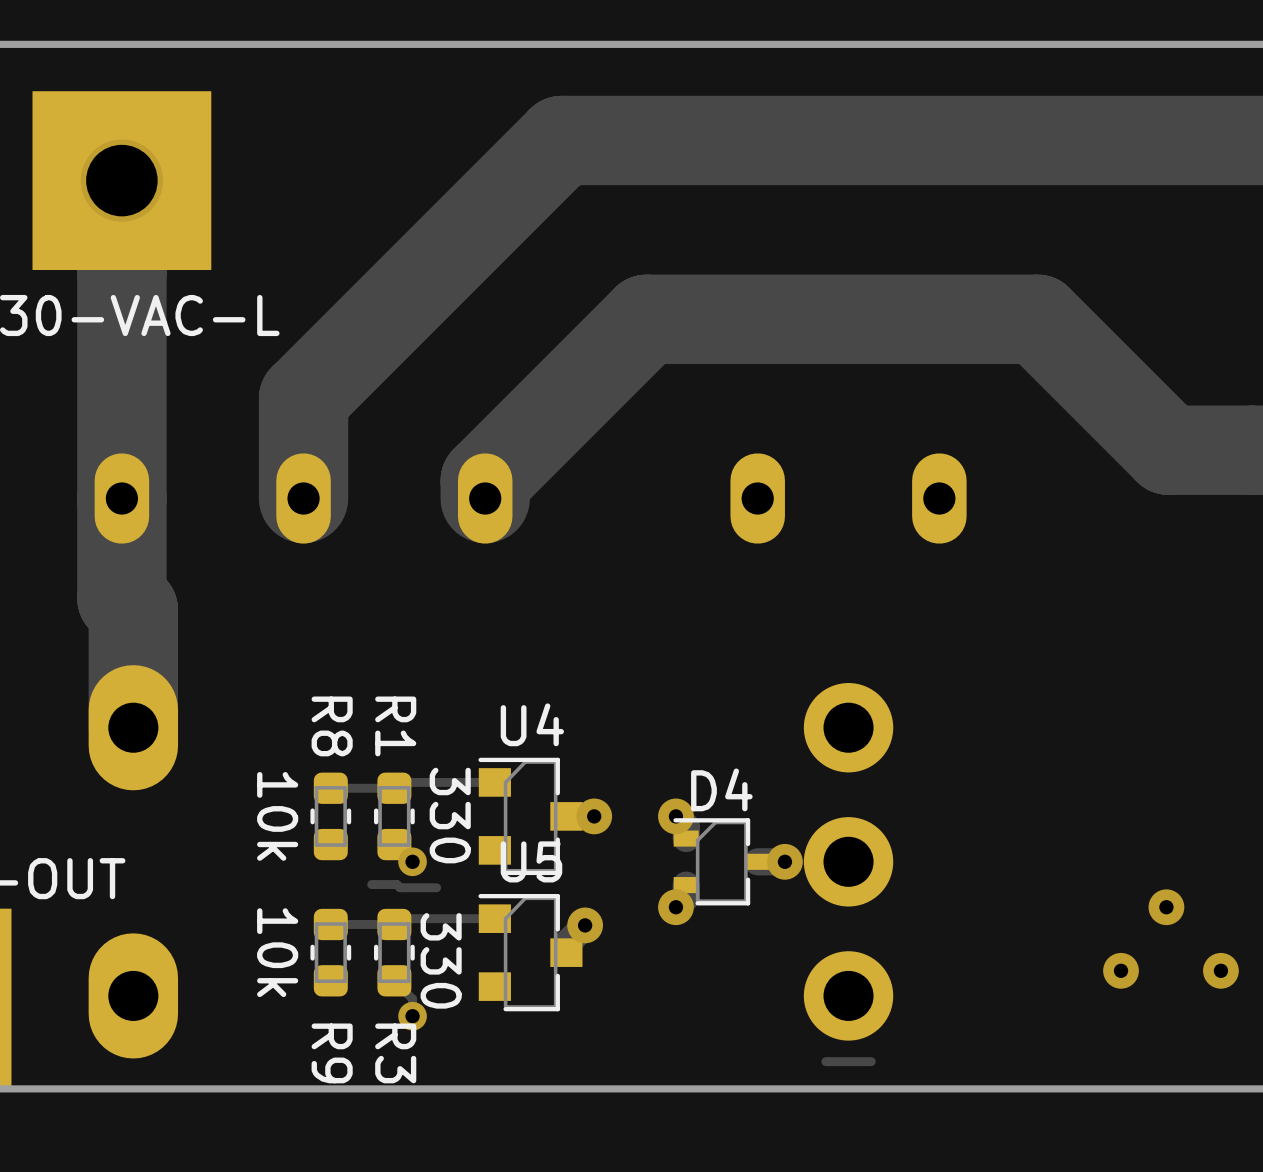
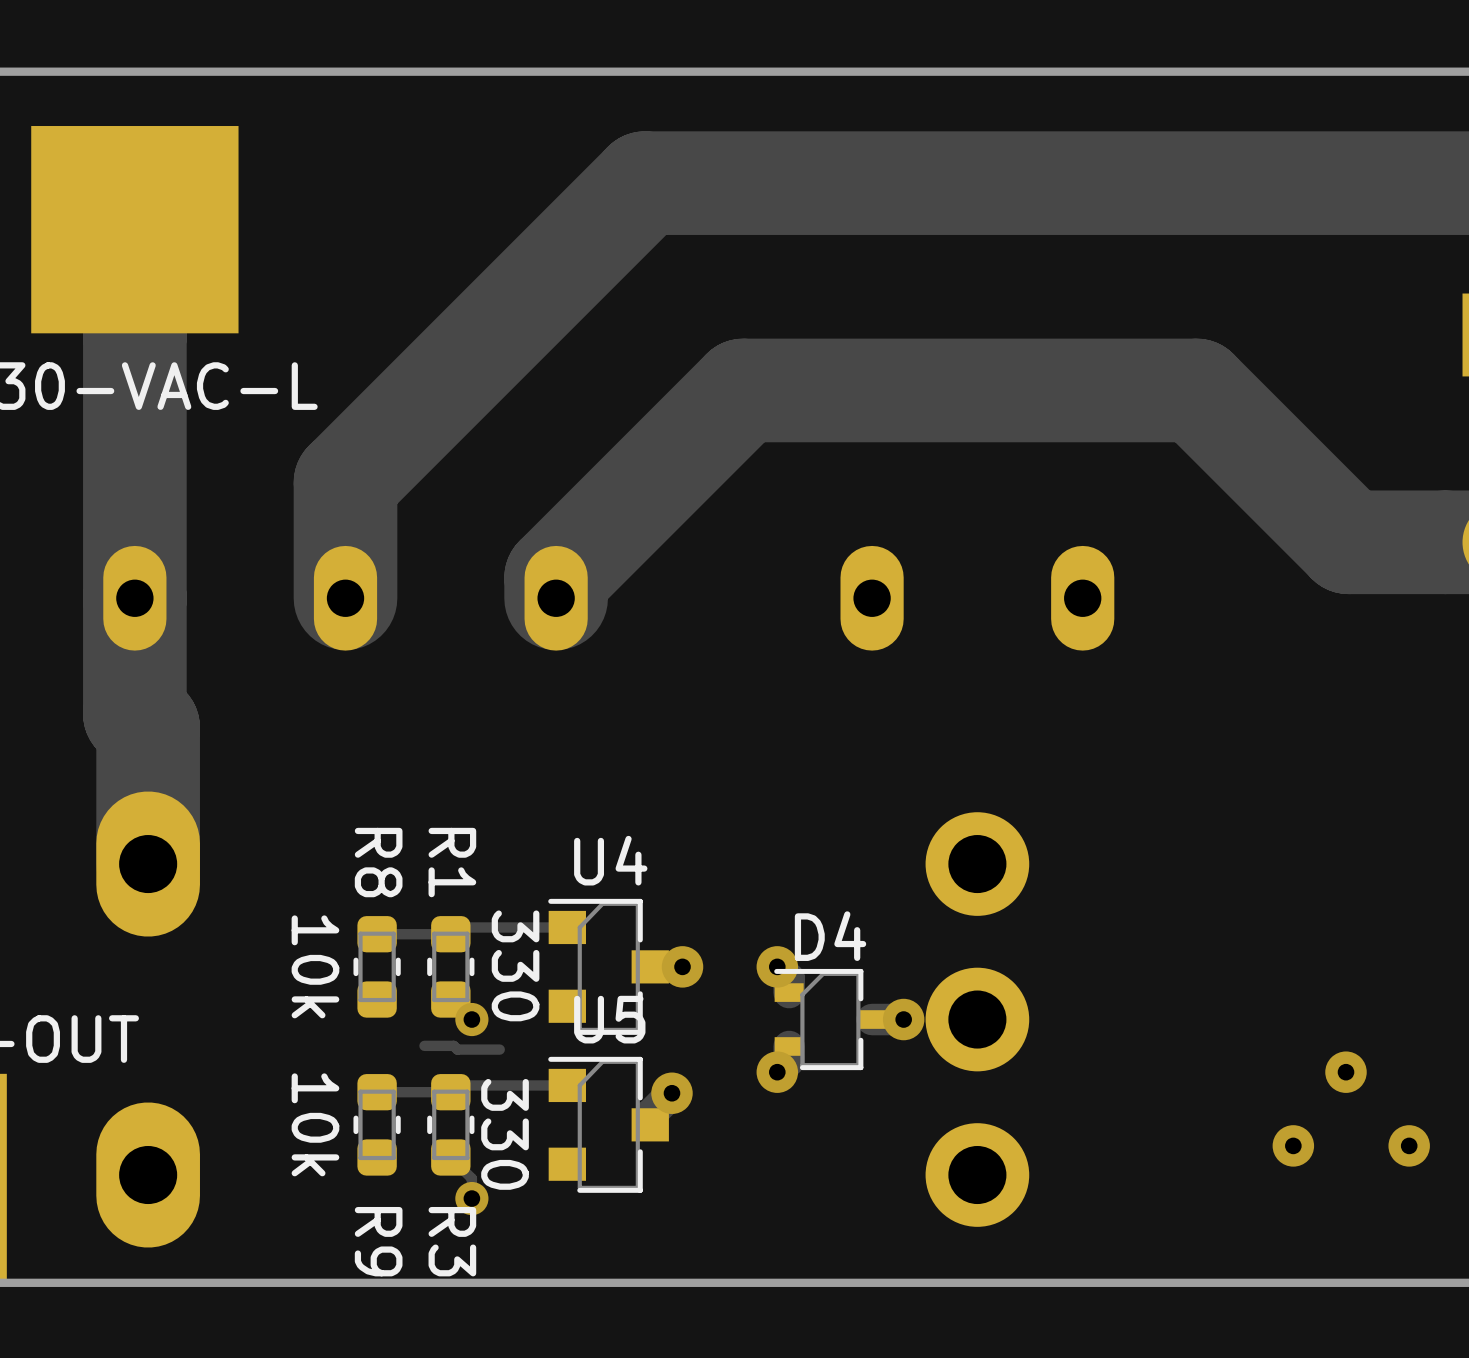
via: (121, 180) -> none
track: (871, 1061) (825, 1061) -> none

